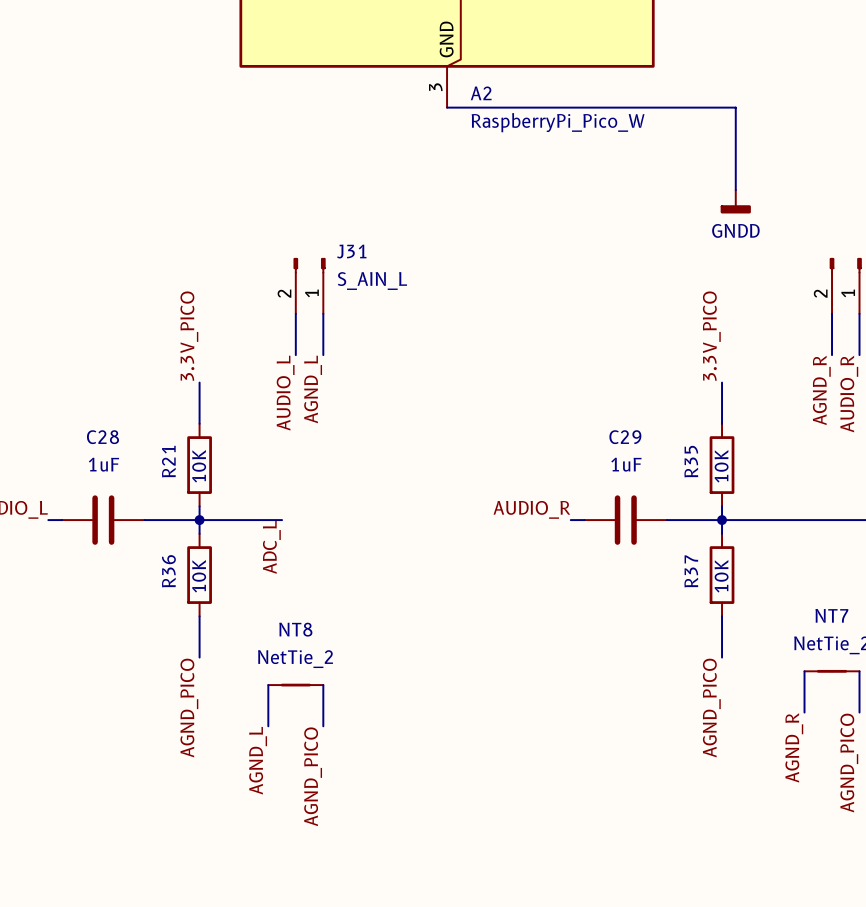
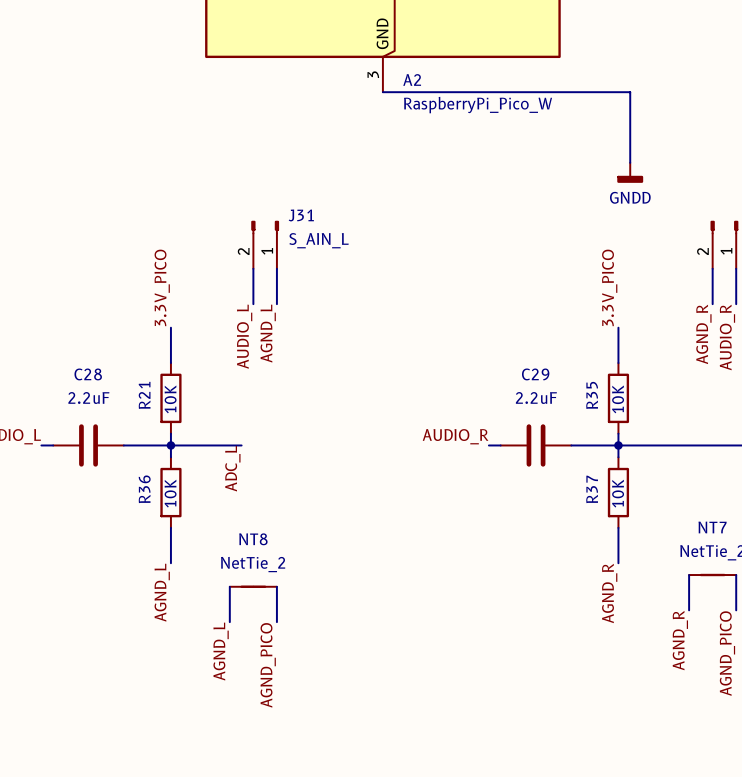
C28 value: 1uF (103, 464) -> 2.2uF (88, 398)
C29 value: 1uF (626, 464) -> 2.2uF (536, 398)
label: AGND_PICO (189, 708) -> AGND_L (162, 592)
label: AGND_PICO (711, 708) -> AGND_R (609, 593)

